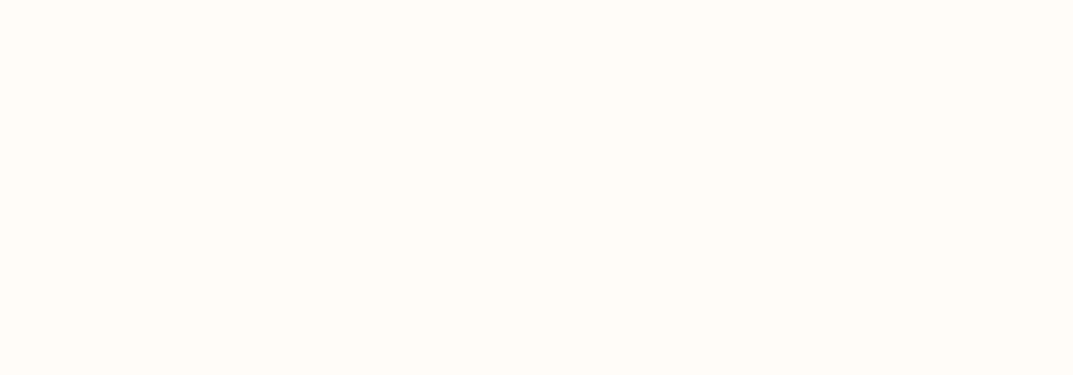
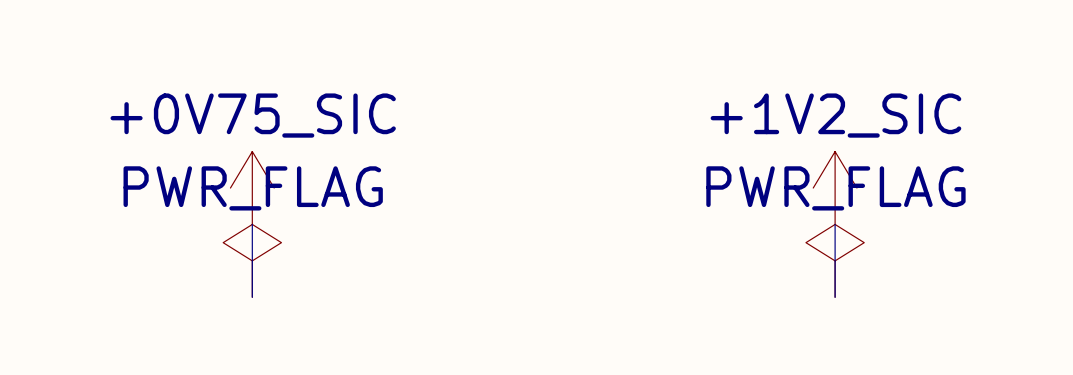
power symbol: none -> +0V75_SIC (252, 188)
power symbol: none -> +1V2_SIC (835, 188)
wire: none -> (252, 224) (252, 297)
wire: none -> (835, 224) (835, 297)
power symbol: none -> PWR_FLAG (252, 260)
power symbol: none -> PWR_FLAG (835, 260)

